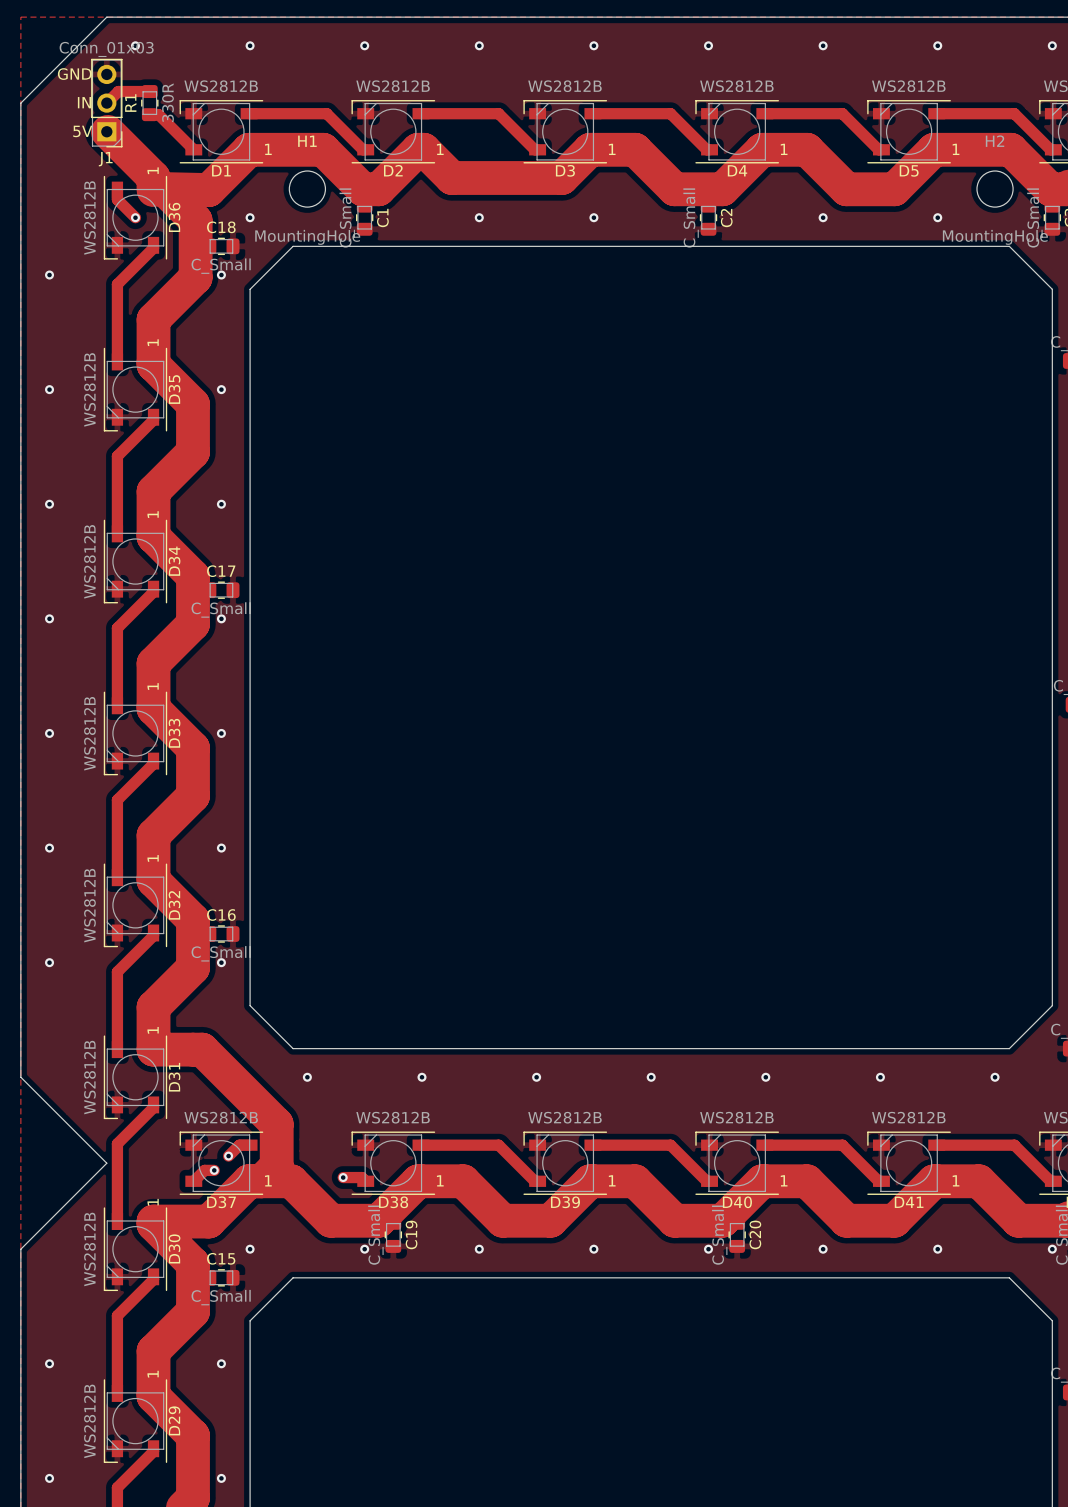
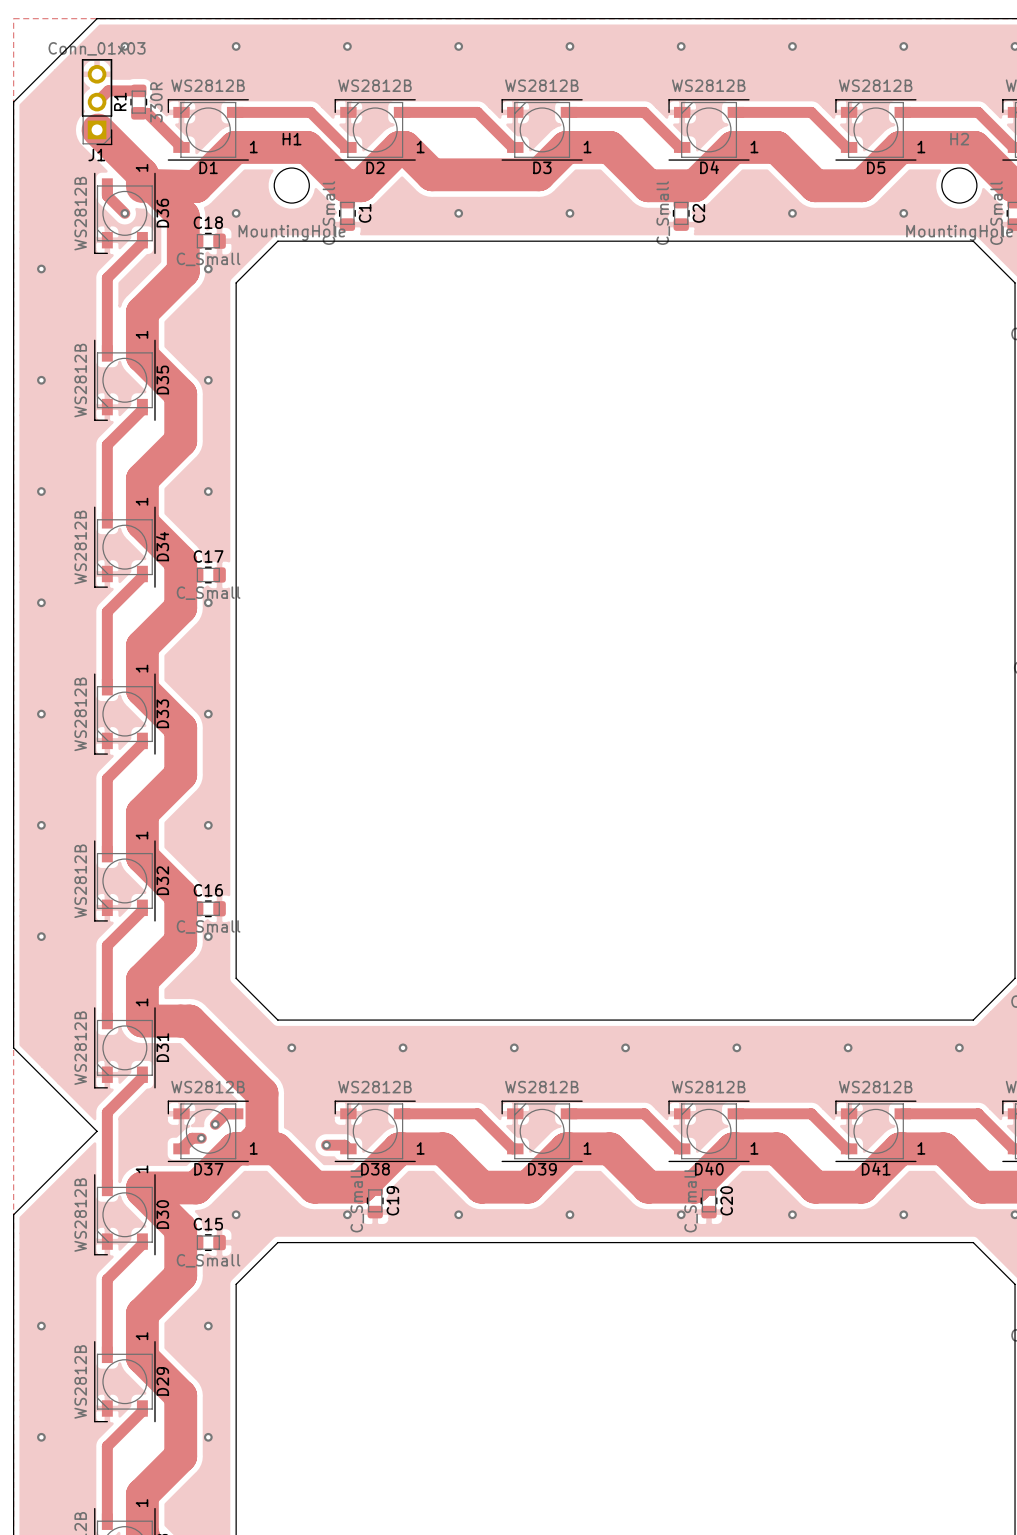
text: GND (74, 74) -> none
text: IN (84, 102) -> none
text: 5V (82, 131) -> none

